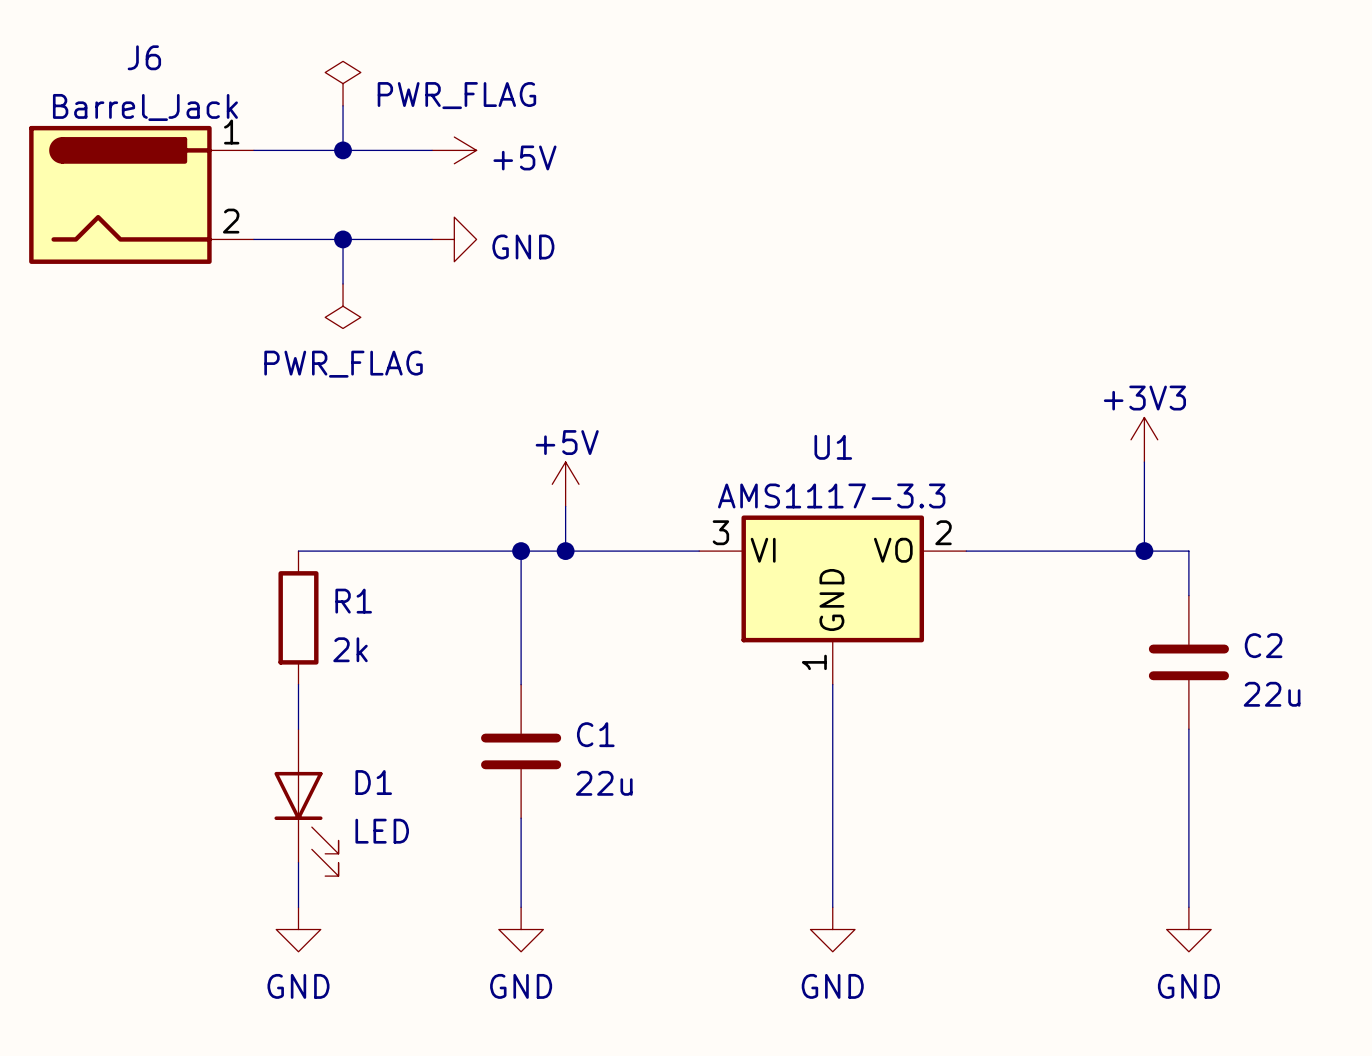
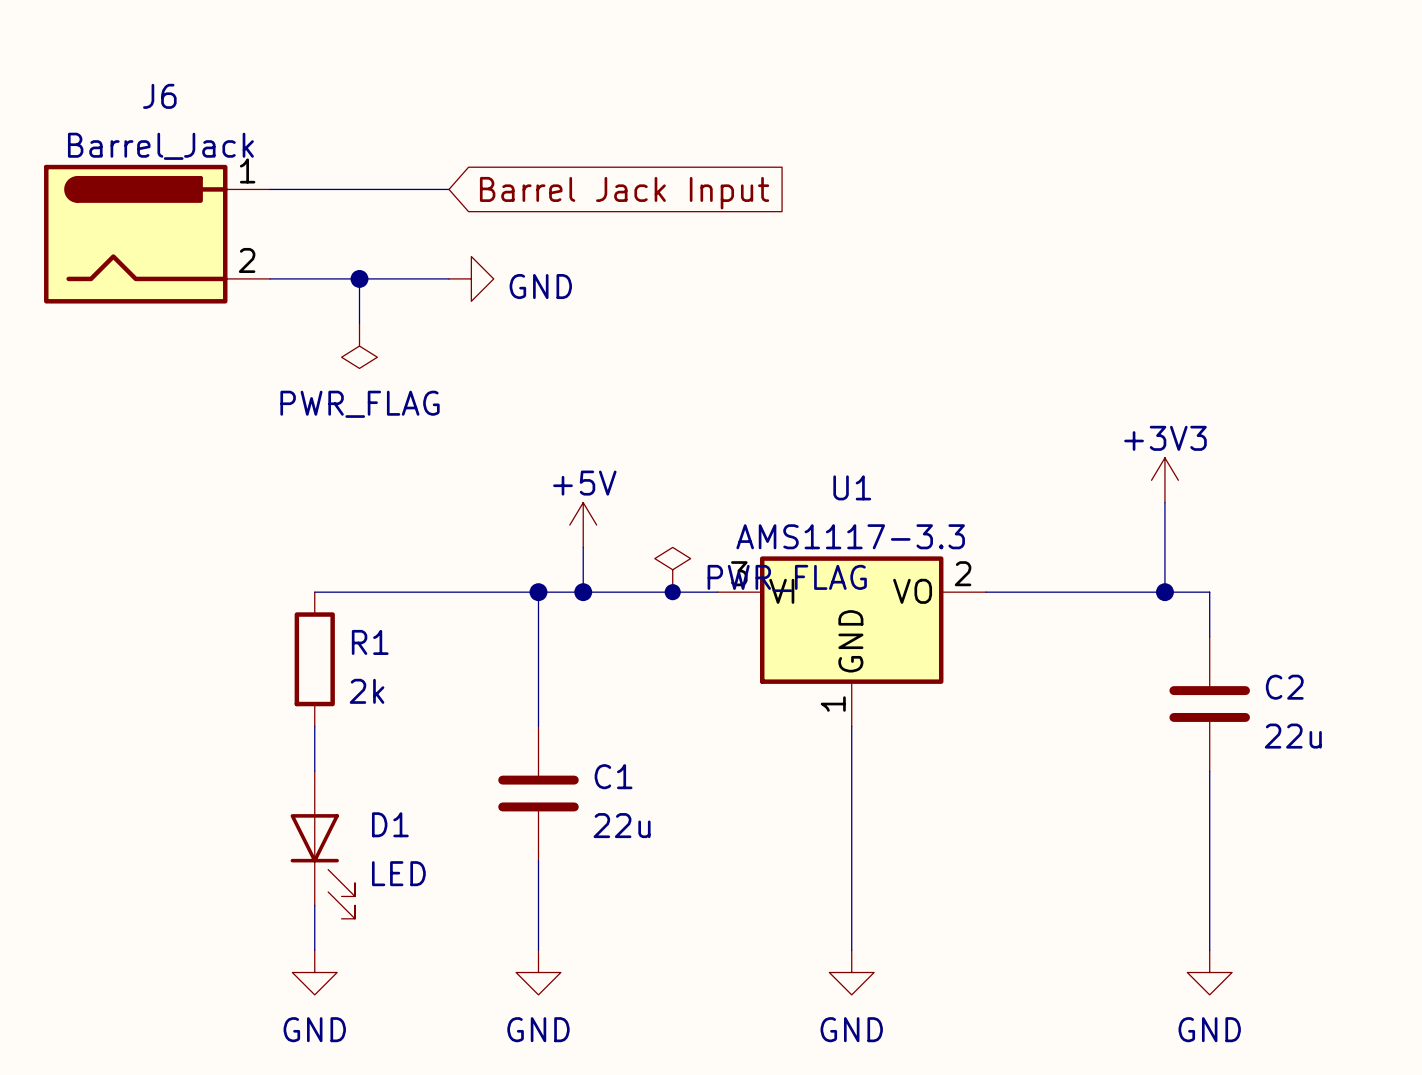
power symbol: PWR_FLAG (343, 83) -> none
wire: (343, 105) (343, 150) -> none
junction: (343, 150) -> none
power symbol: +5V (454, 150) -> none
global label: none -> Barrel Jack Input (624, 193)
power symbol: none -> PWR_FLAG (672, 569)
junction: none -> (672, 592)

